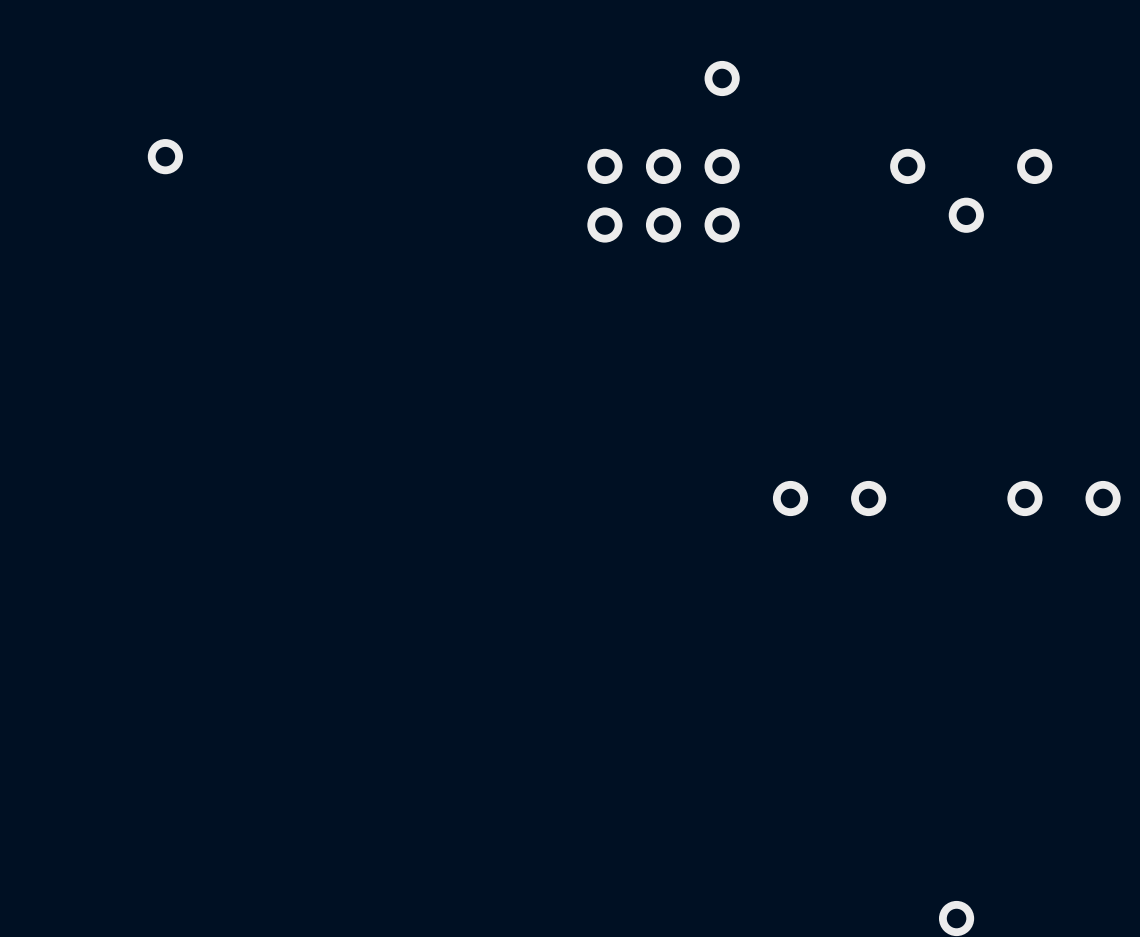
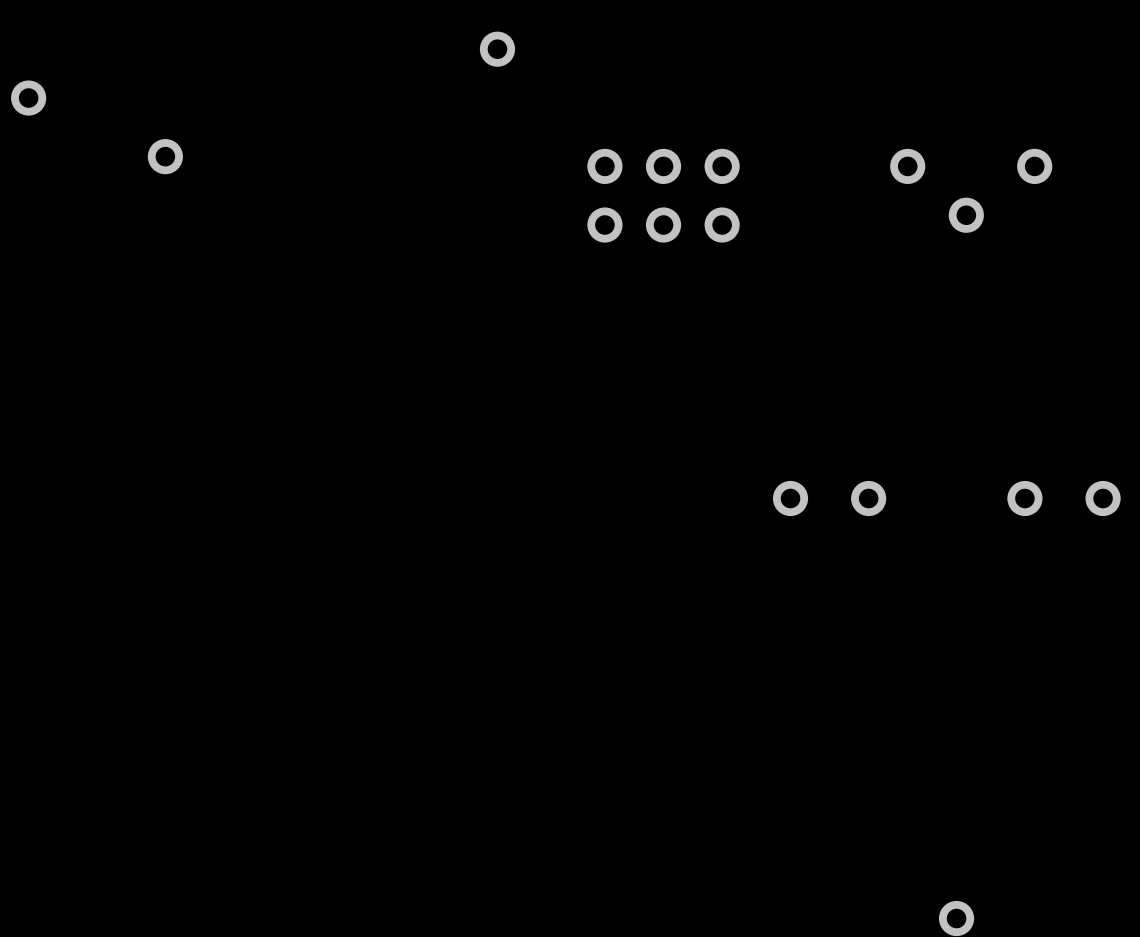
via: none -> (497, 49)
via: (722, 78) -> none
via: none -> (28, 98)

